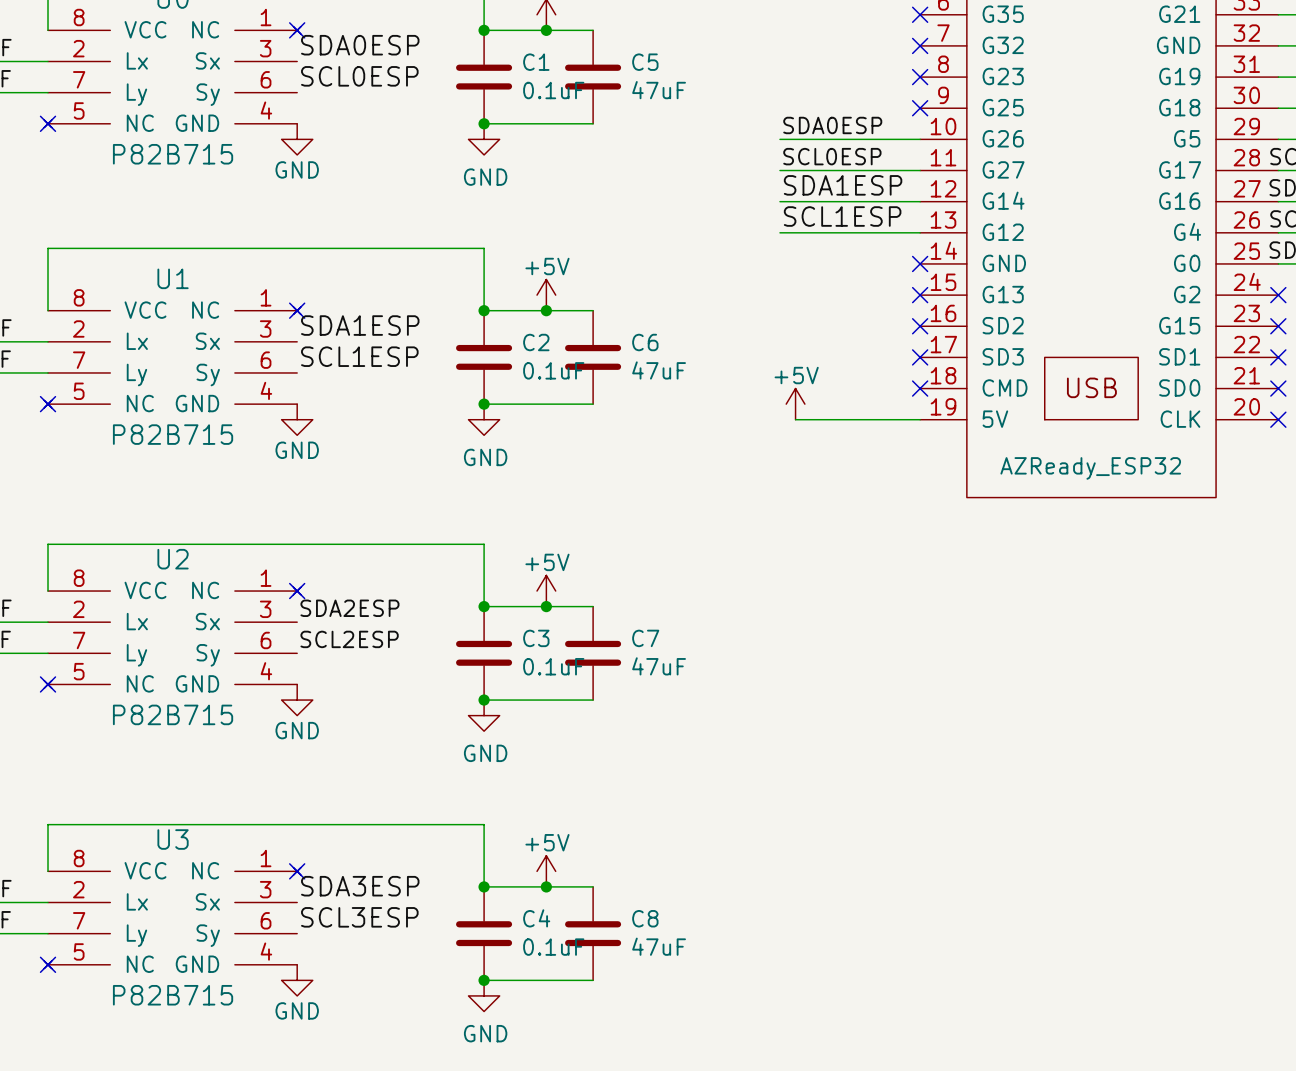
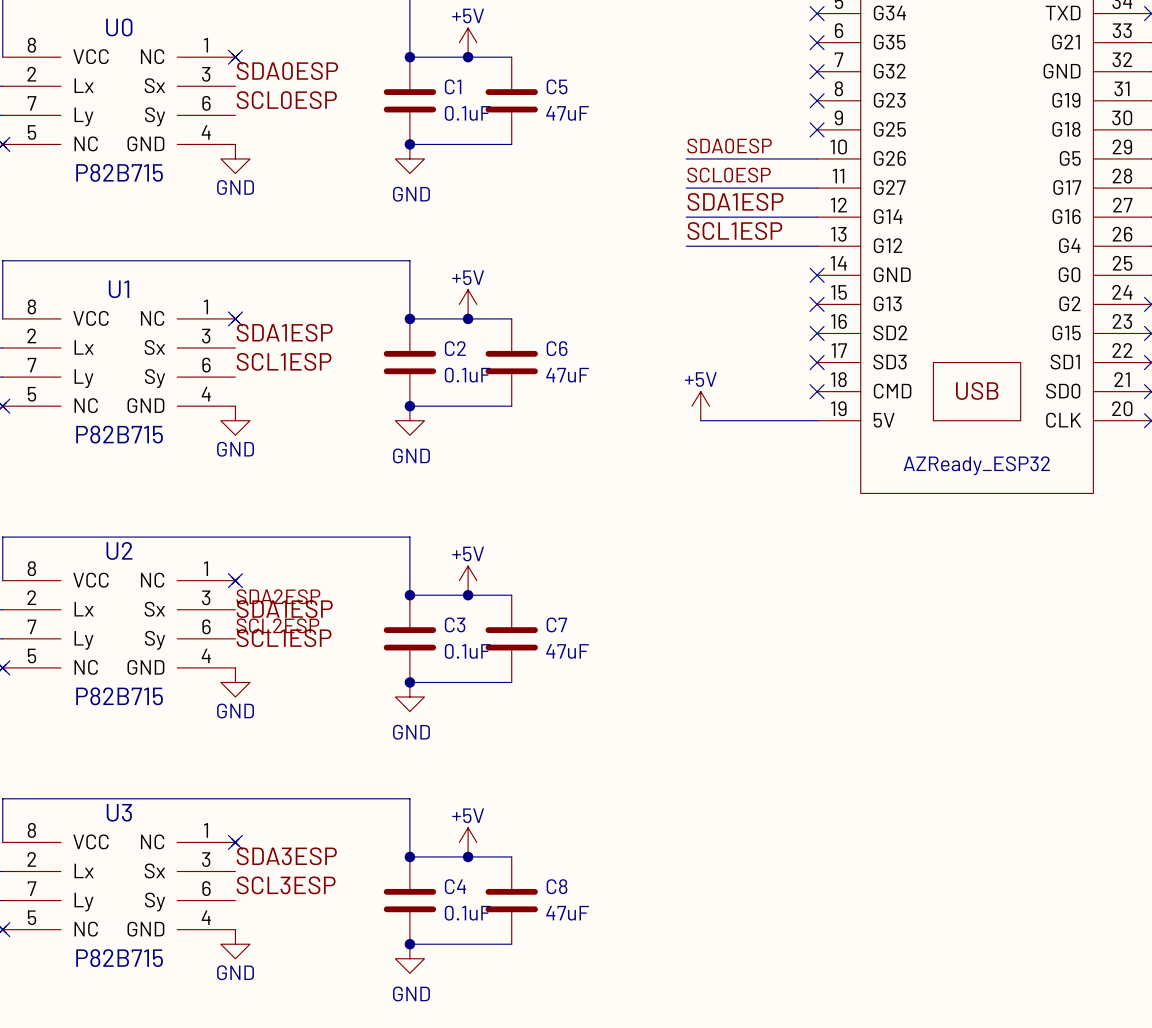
label: none -> SDA1ESP (284, 609)
label: none -> SCL1ESP (284, 638)

